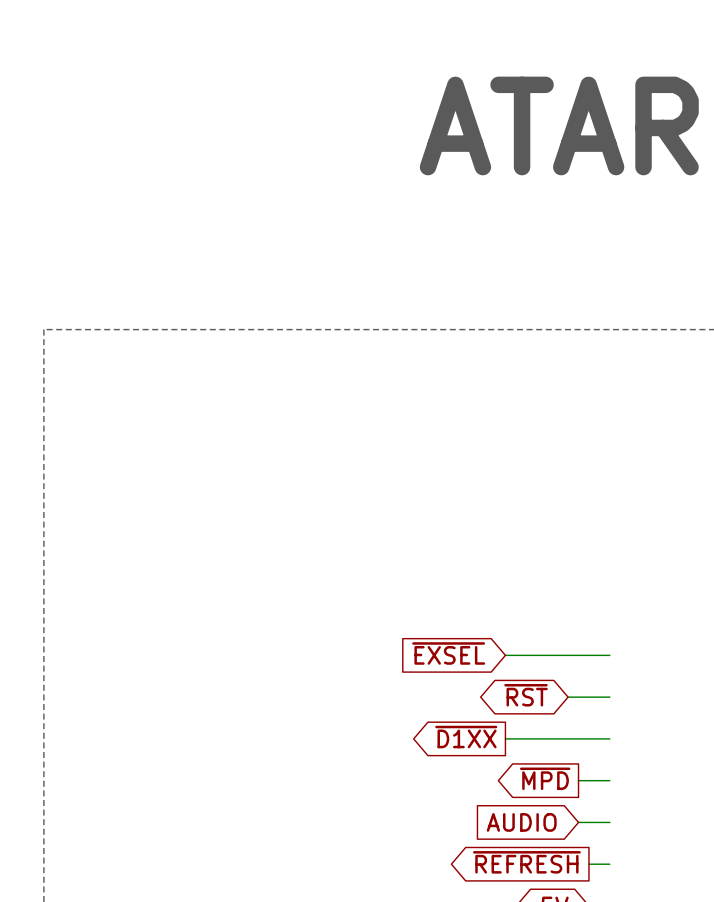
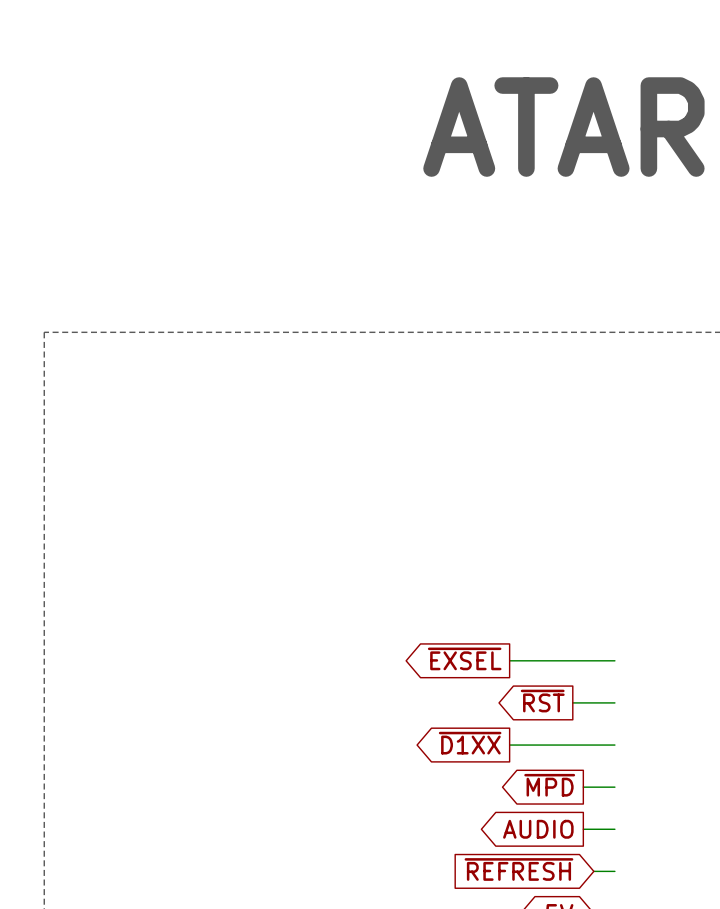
global label shape: input (448, 653) -> output (464, 658)
global label shape: bidirectional (526, 695) -> output (542, 701)
global label shape: input (521, 822) -> output (538, 829)
global label shape: output (526, 862) -> input (518, 869)

